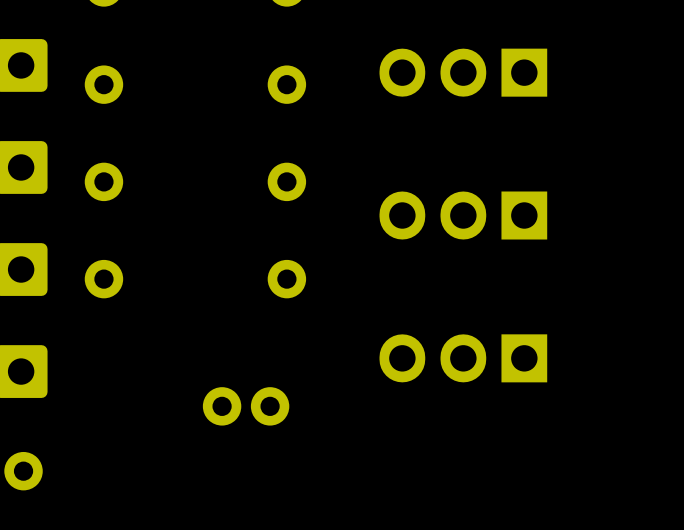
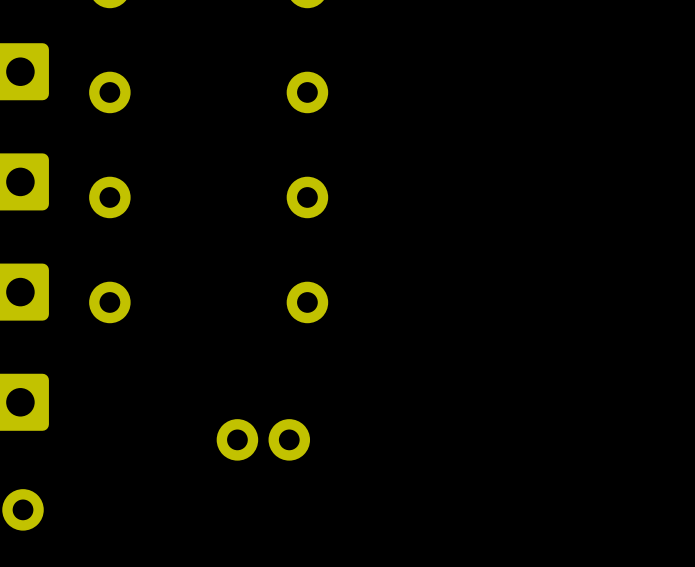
part: (463, 72) -> none
part: (463, 215) -> none
part: (463, 358) -> none

